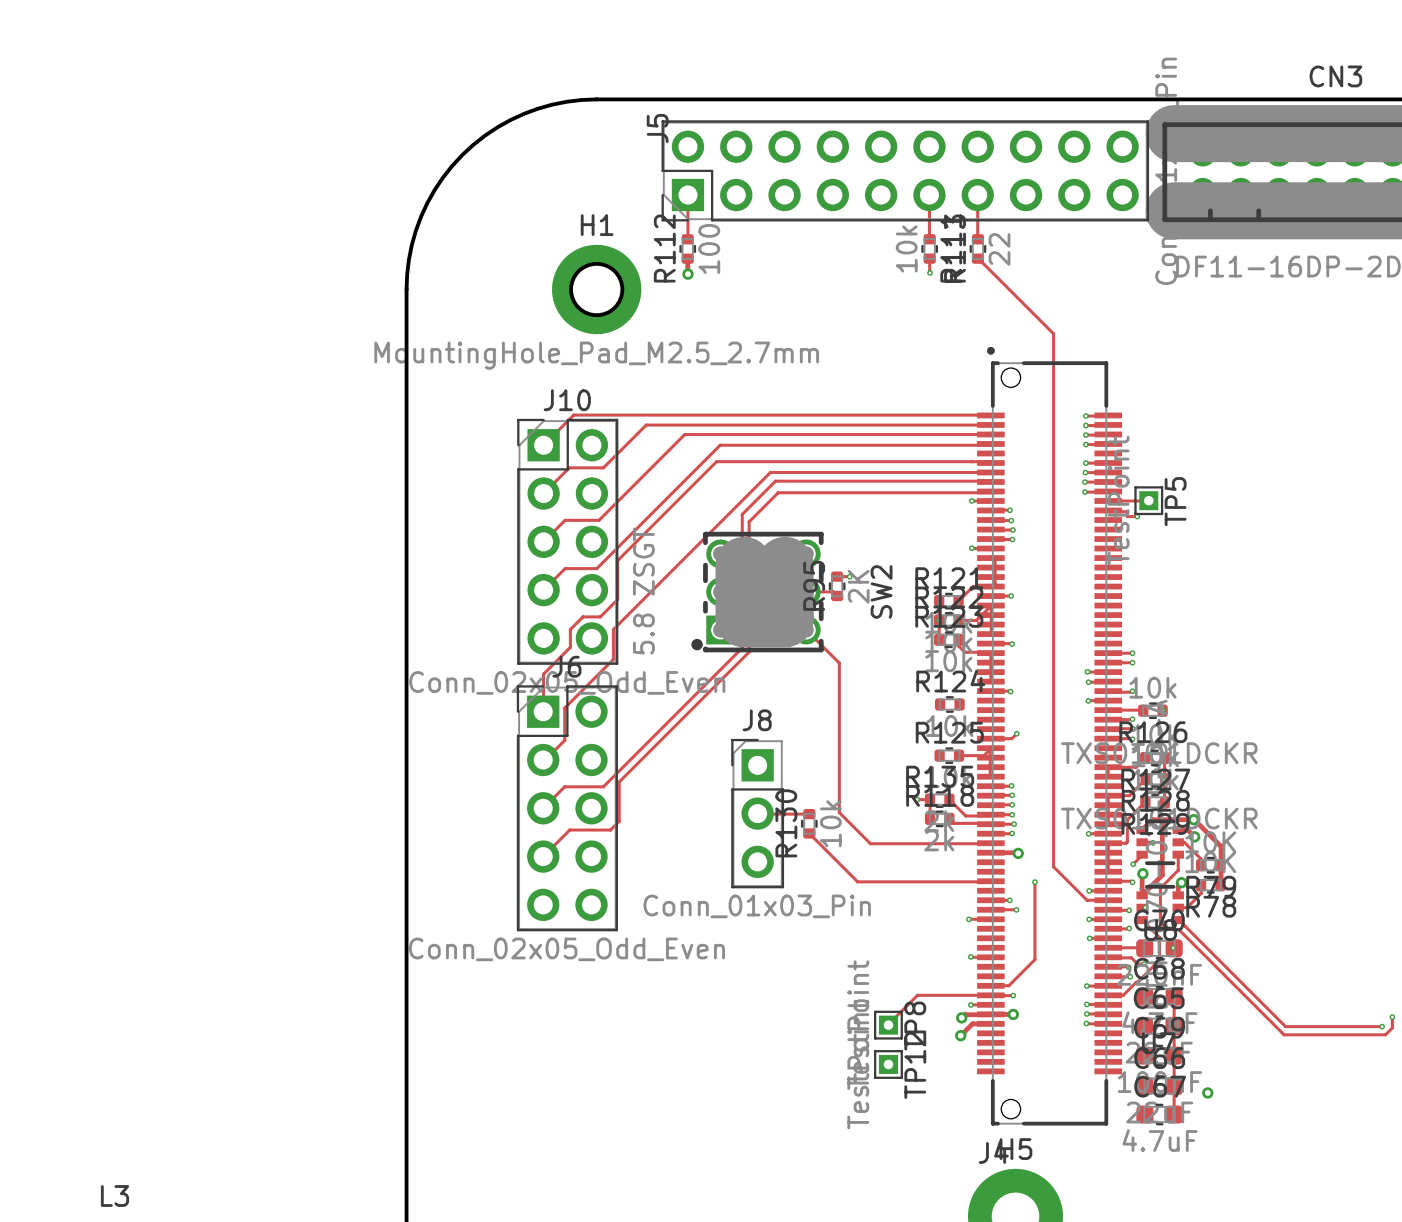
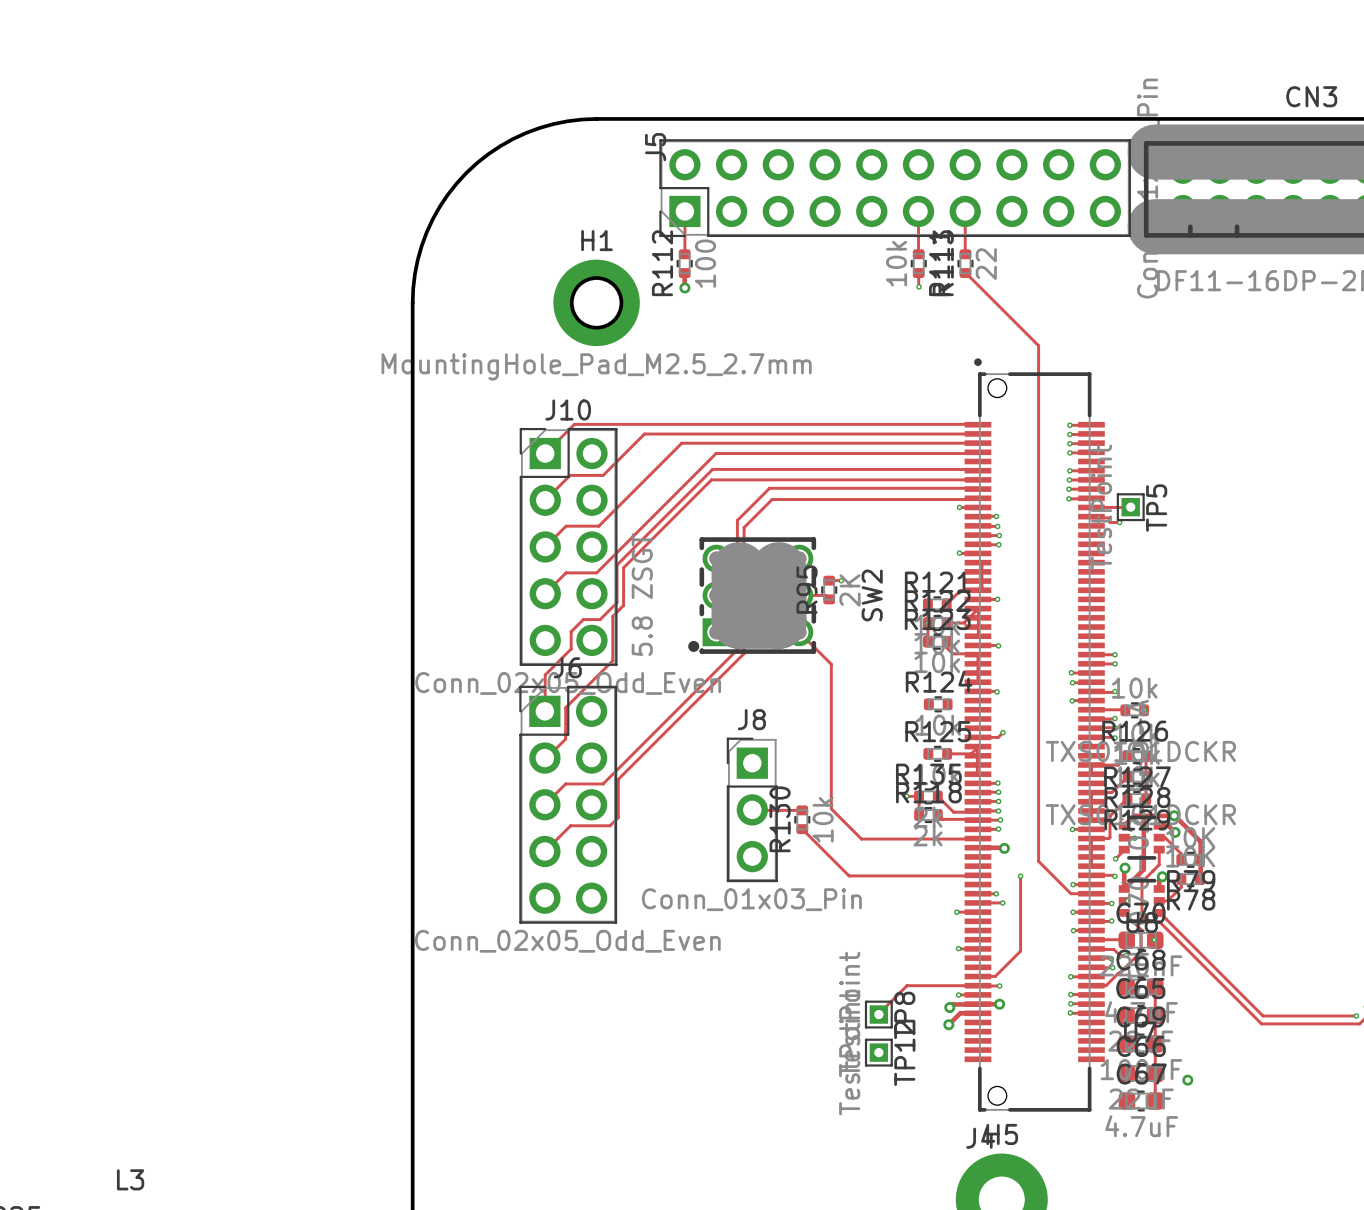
track: (770, 472) (613, 629) -> (764, 479) (711, 479) (623, 567) (623, 605) (612, 616) (612, 631)

